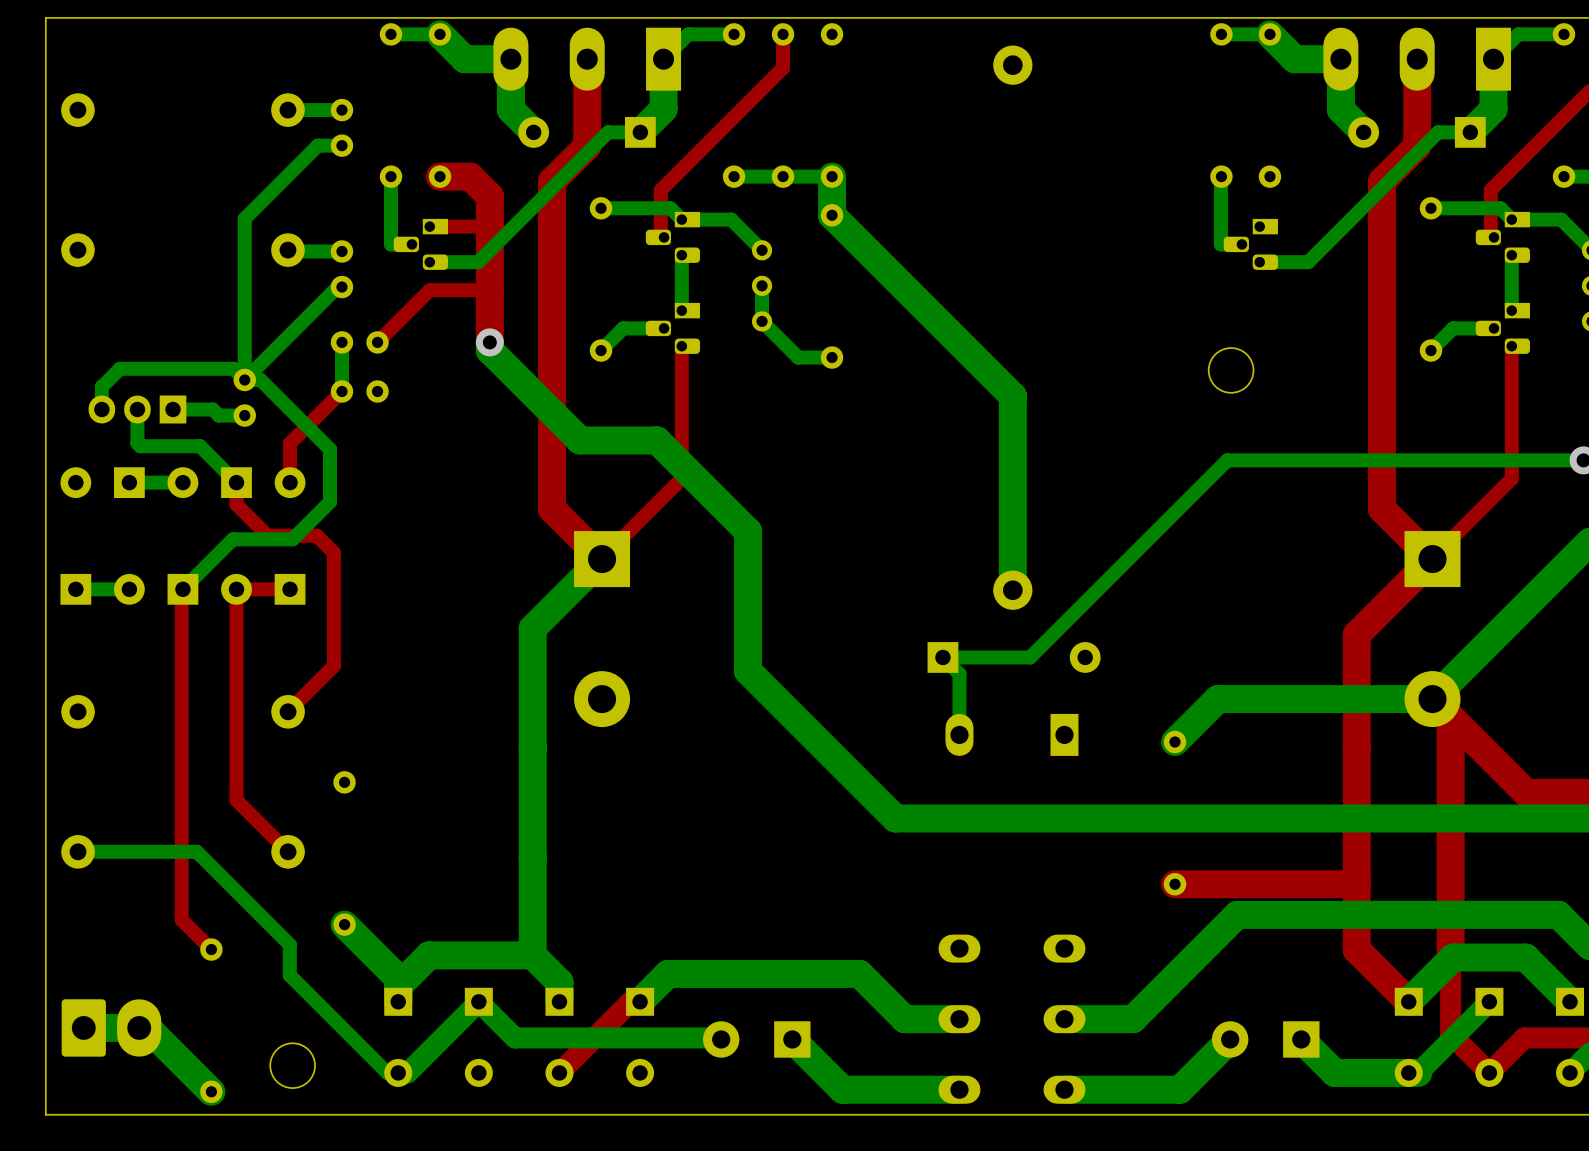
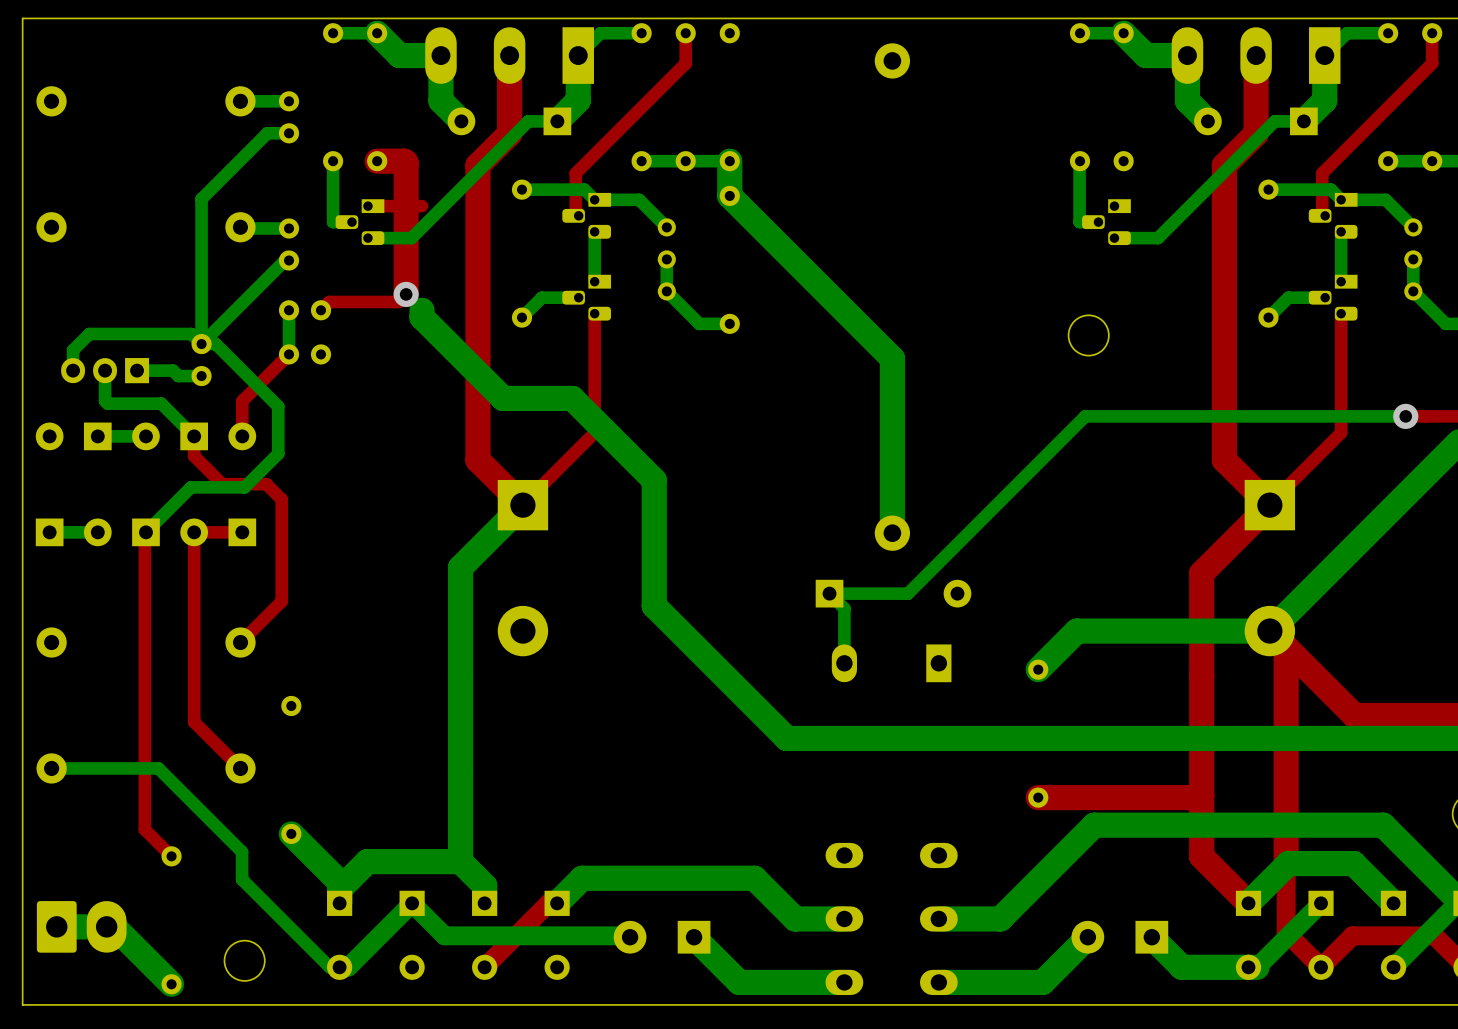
top track: (472, 178) (489, 196) (489, 342) -> (406, 162) (406, 294) (398, 301) (329, 301)
top track: (489, 289) (429, 290) (386, 333) -> none
via position: (489, 342) -> (406, 294)

